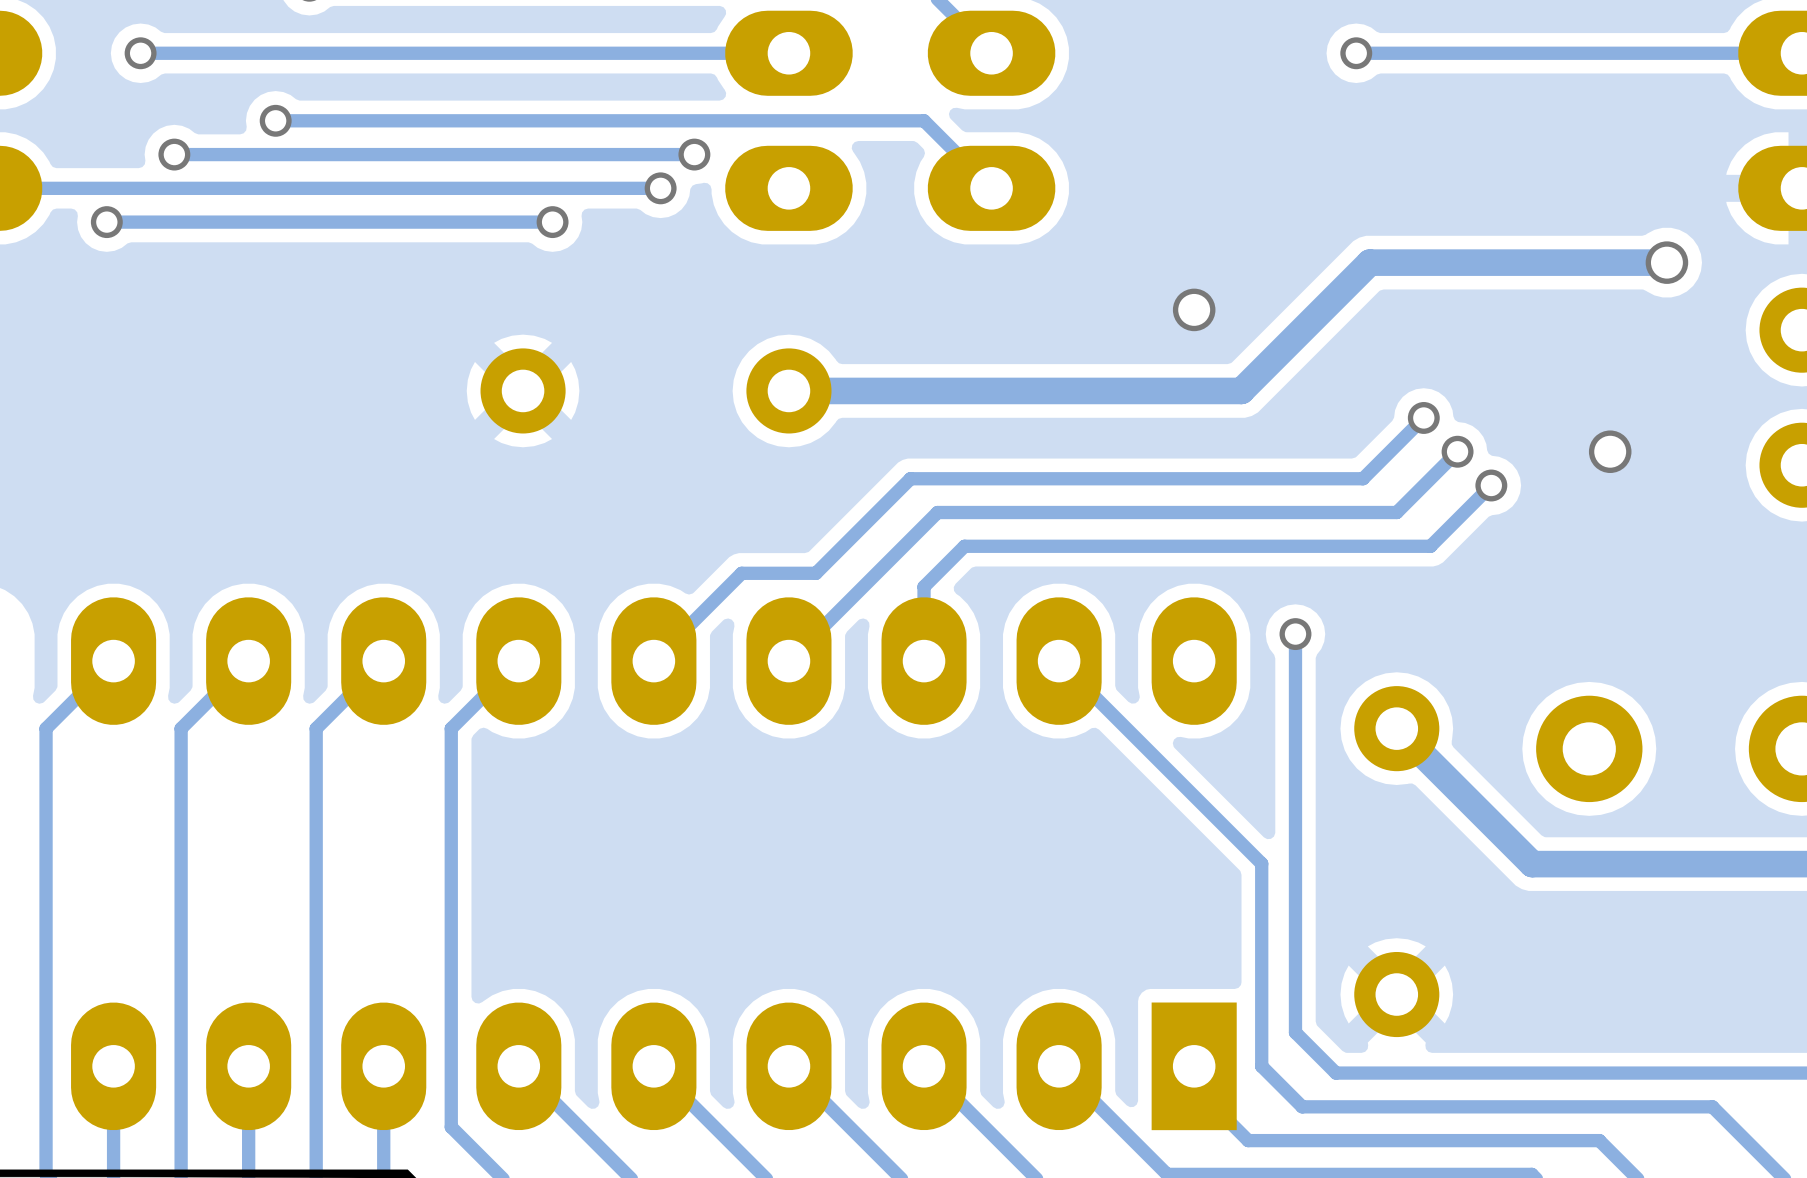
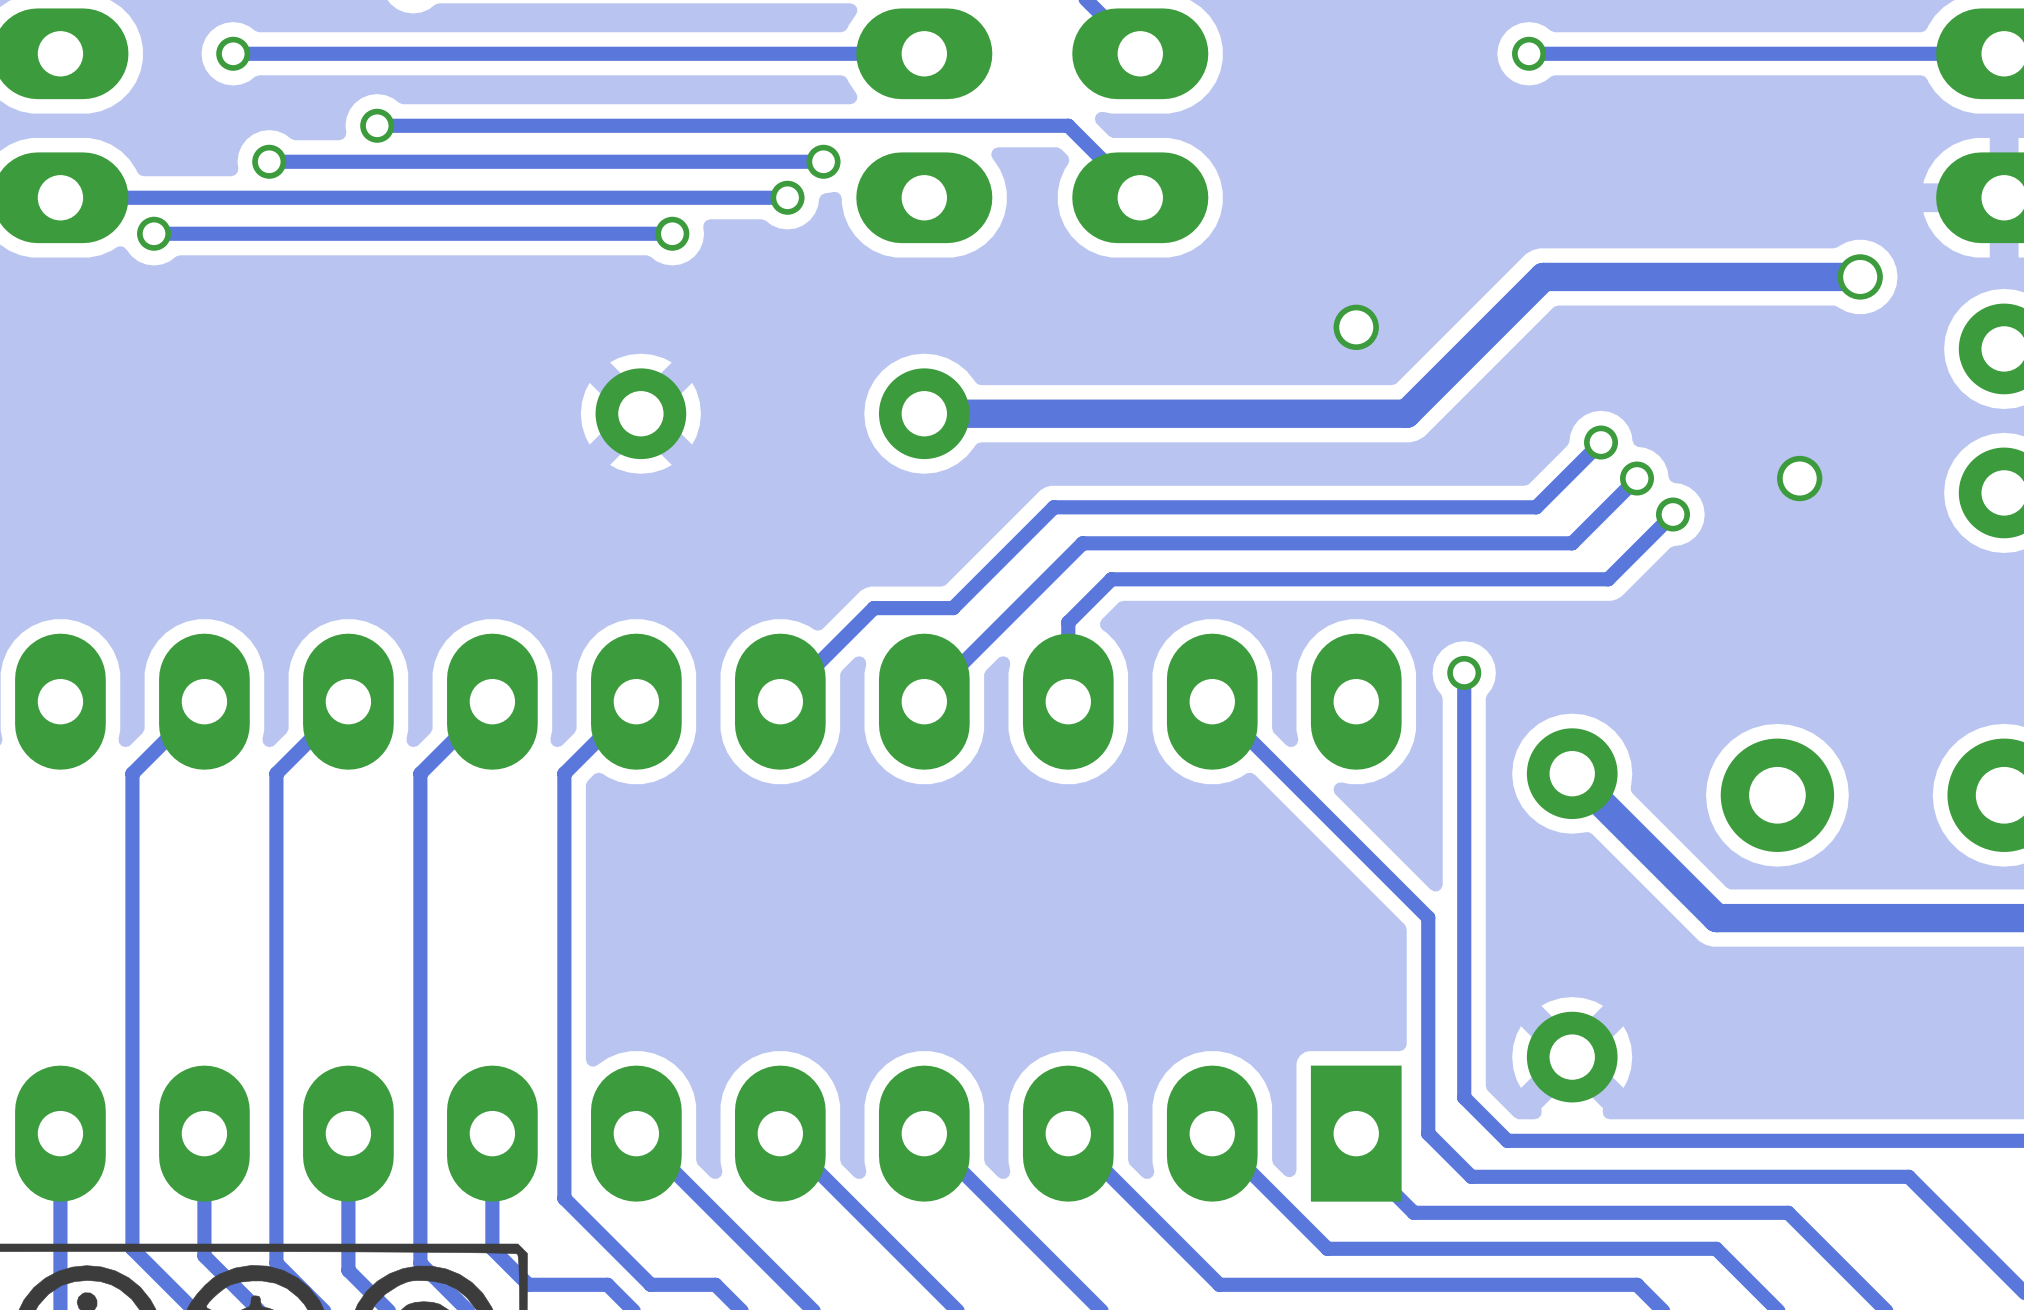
track: none -> (197, 233) (154, 233)
via position: (106, 222) -> (154, 233)

